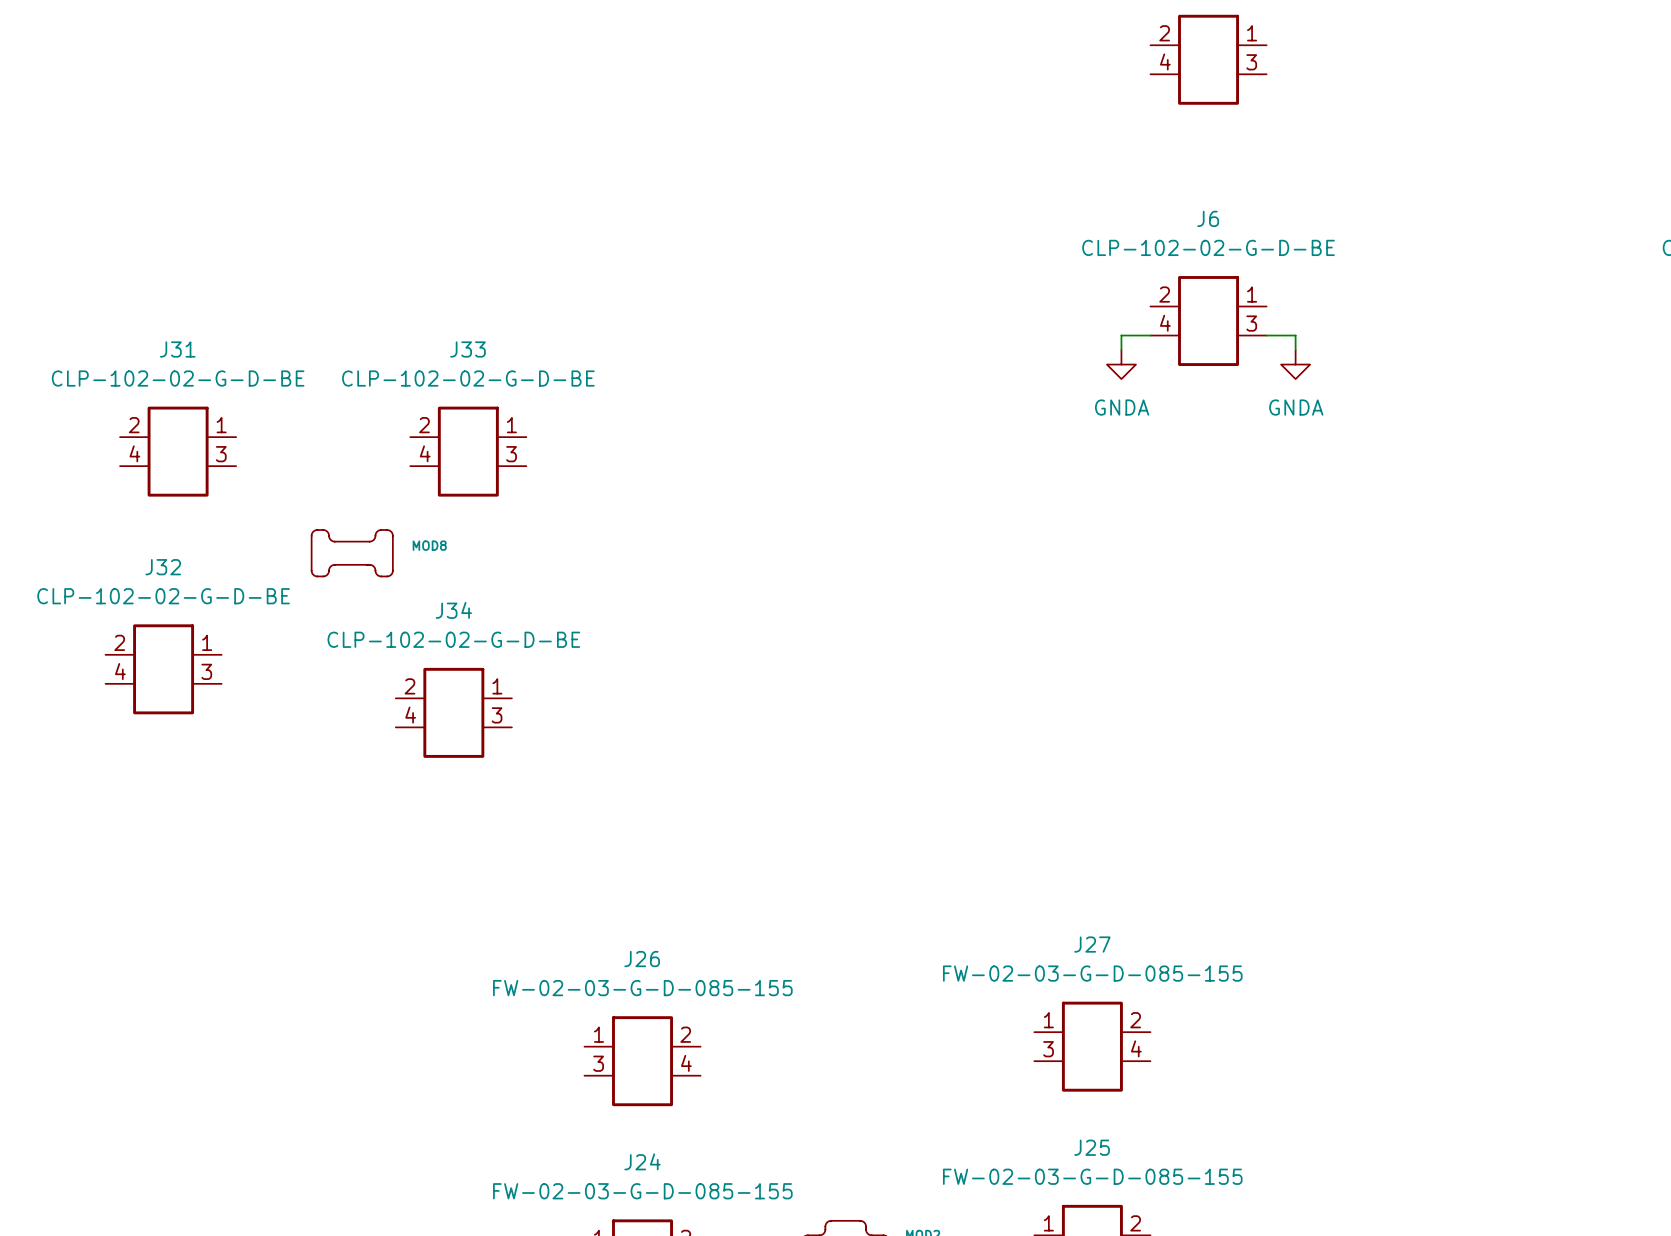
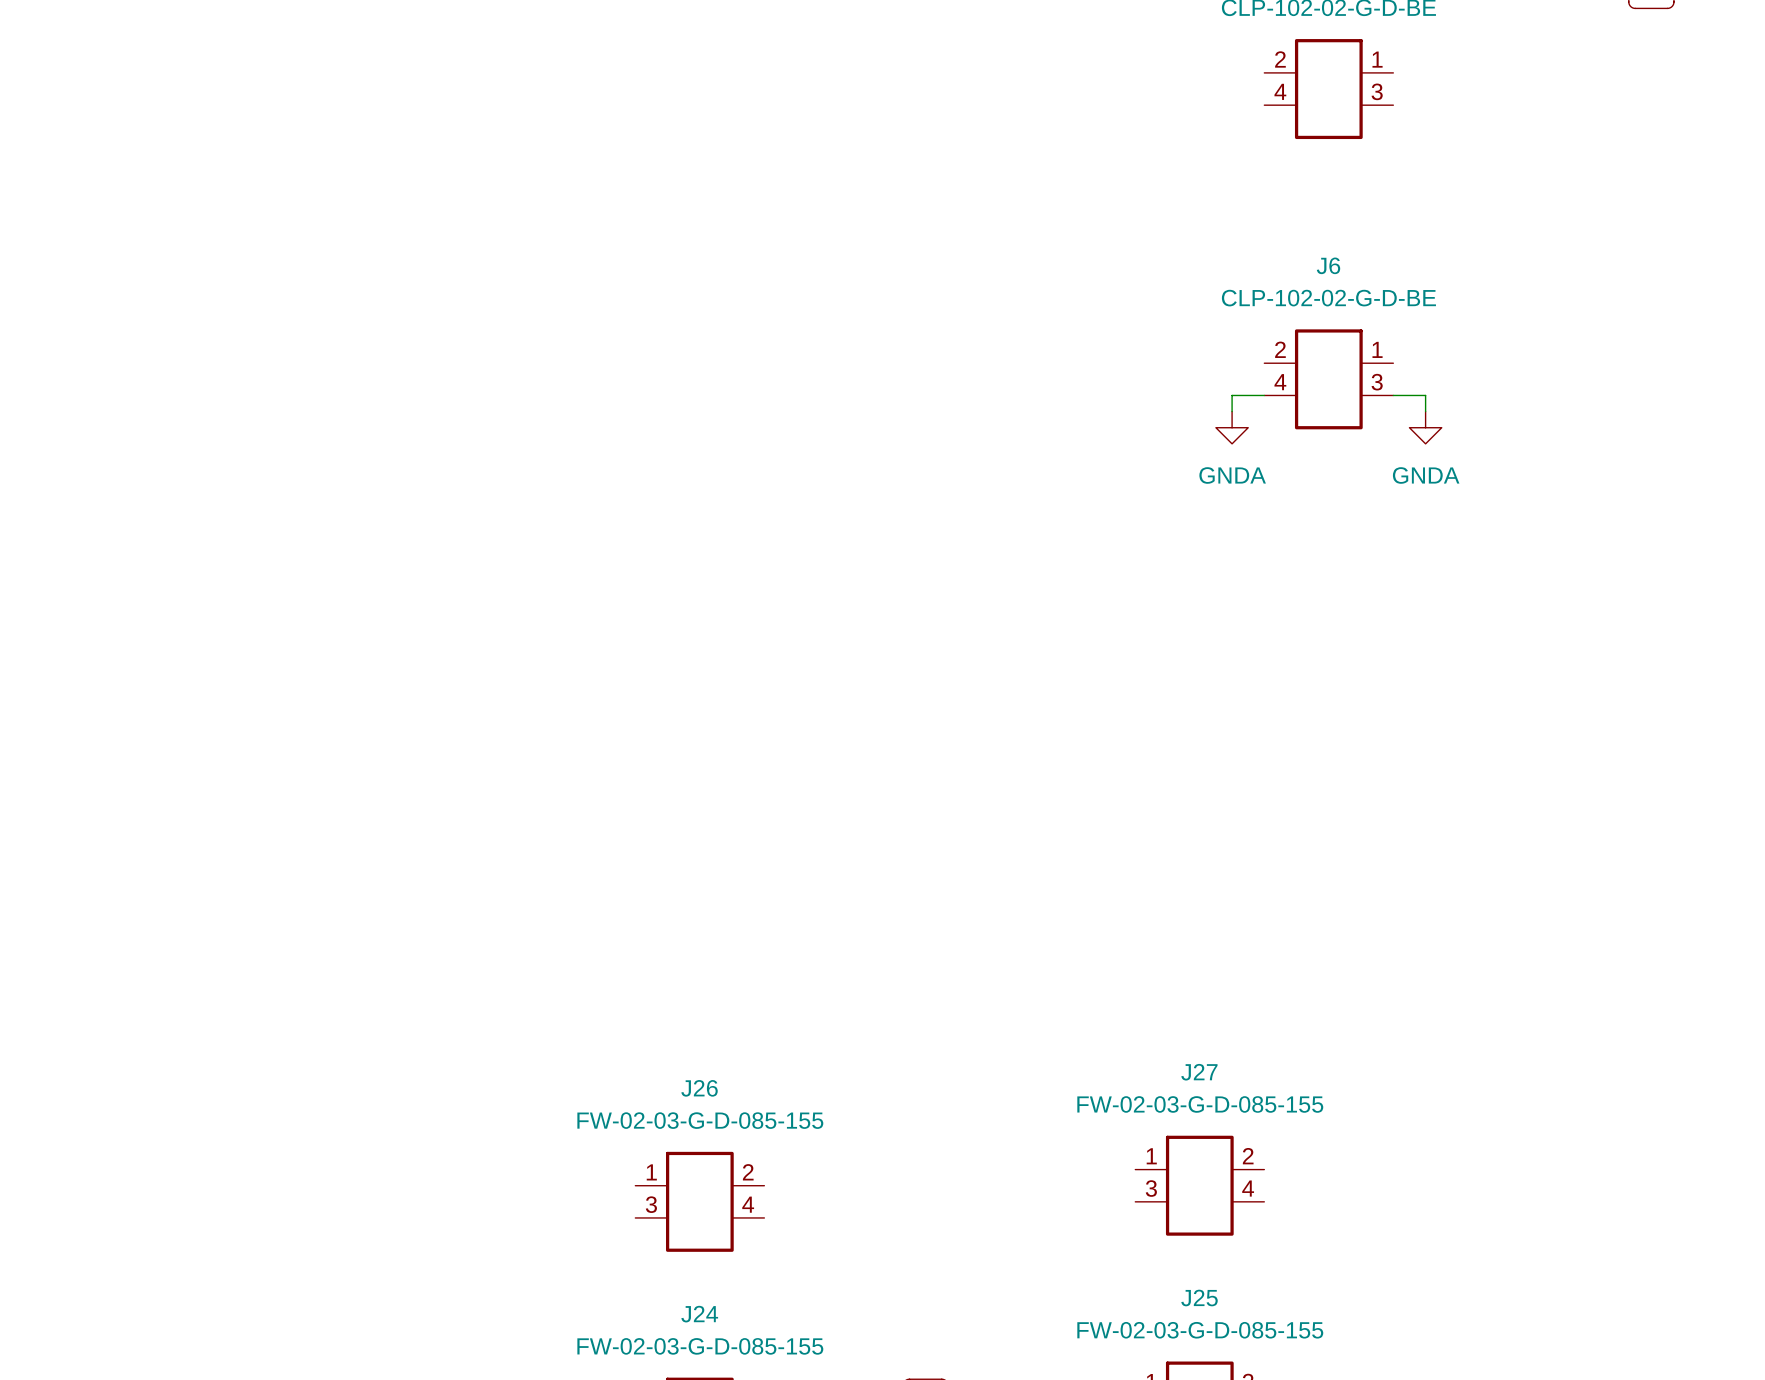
J31: CLP-102-02-G-D-BE (178, 451) -> none
J33: CLP-102-02-G-D-BE (468, 451) -> none
MOD8: (352, 553) -> none
J32: CLP-102-02-G-D-BE (163, 669) -> none
J34: CLP-102-02-G-D-BE (453, 712) -> none

